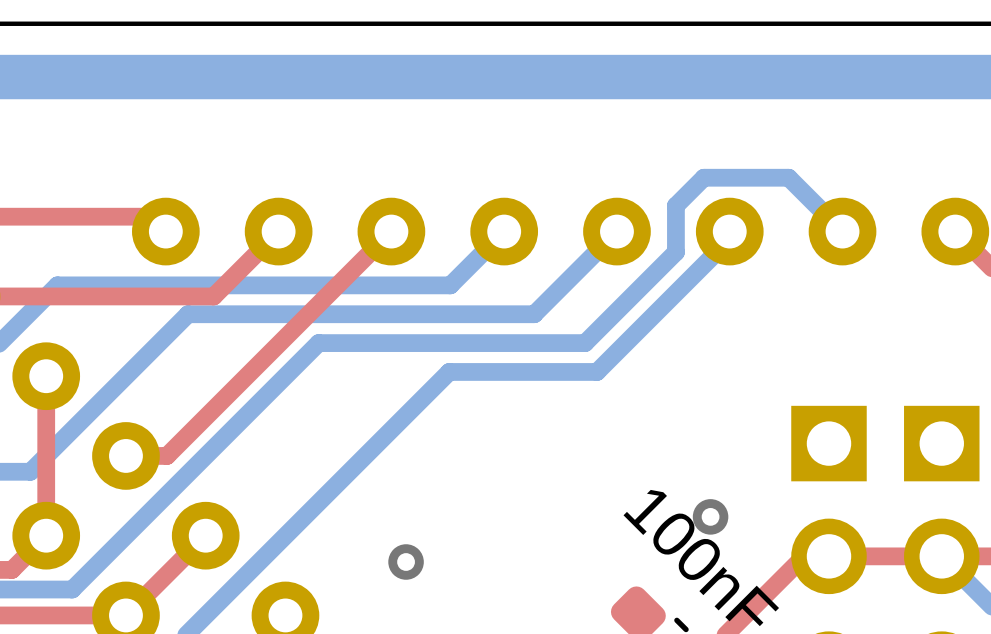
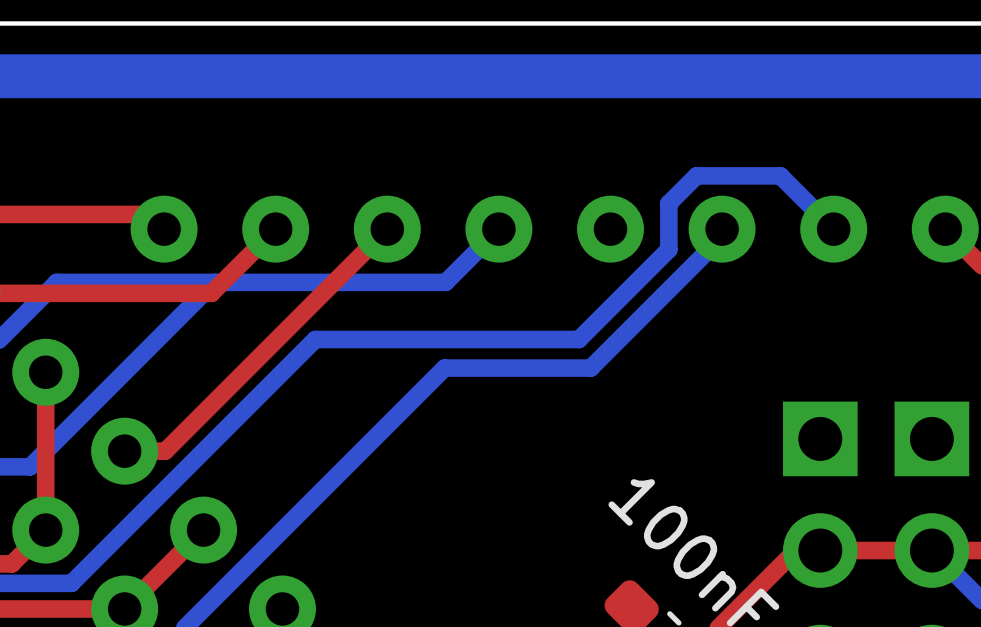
bottom track: (616, 231) (534, 314) (188, 314) (30, 471) -> (214, 282) (30, 466)
via: (710, 516) -> none
via: (406, 562) -> none

